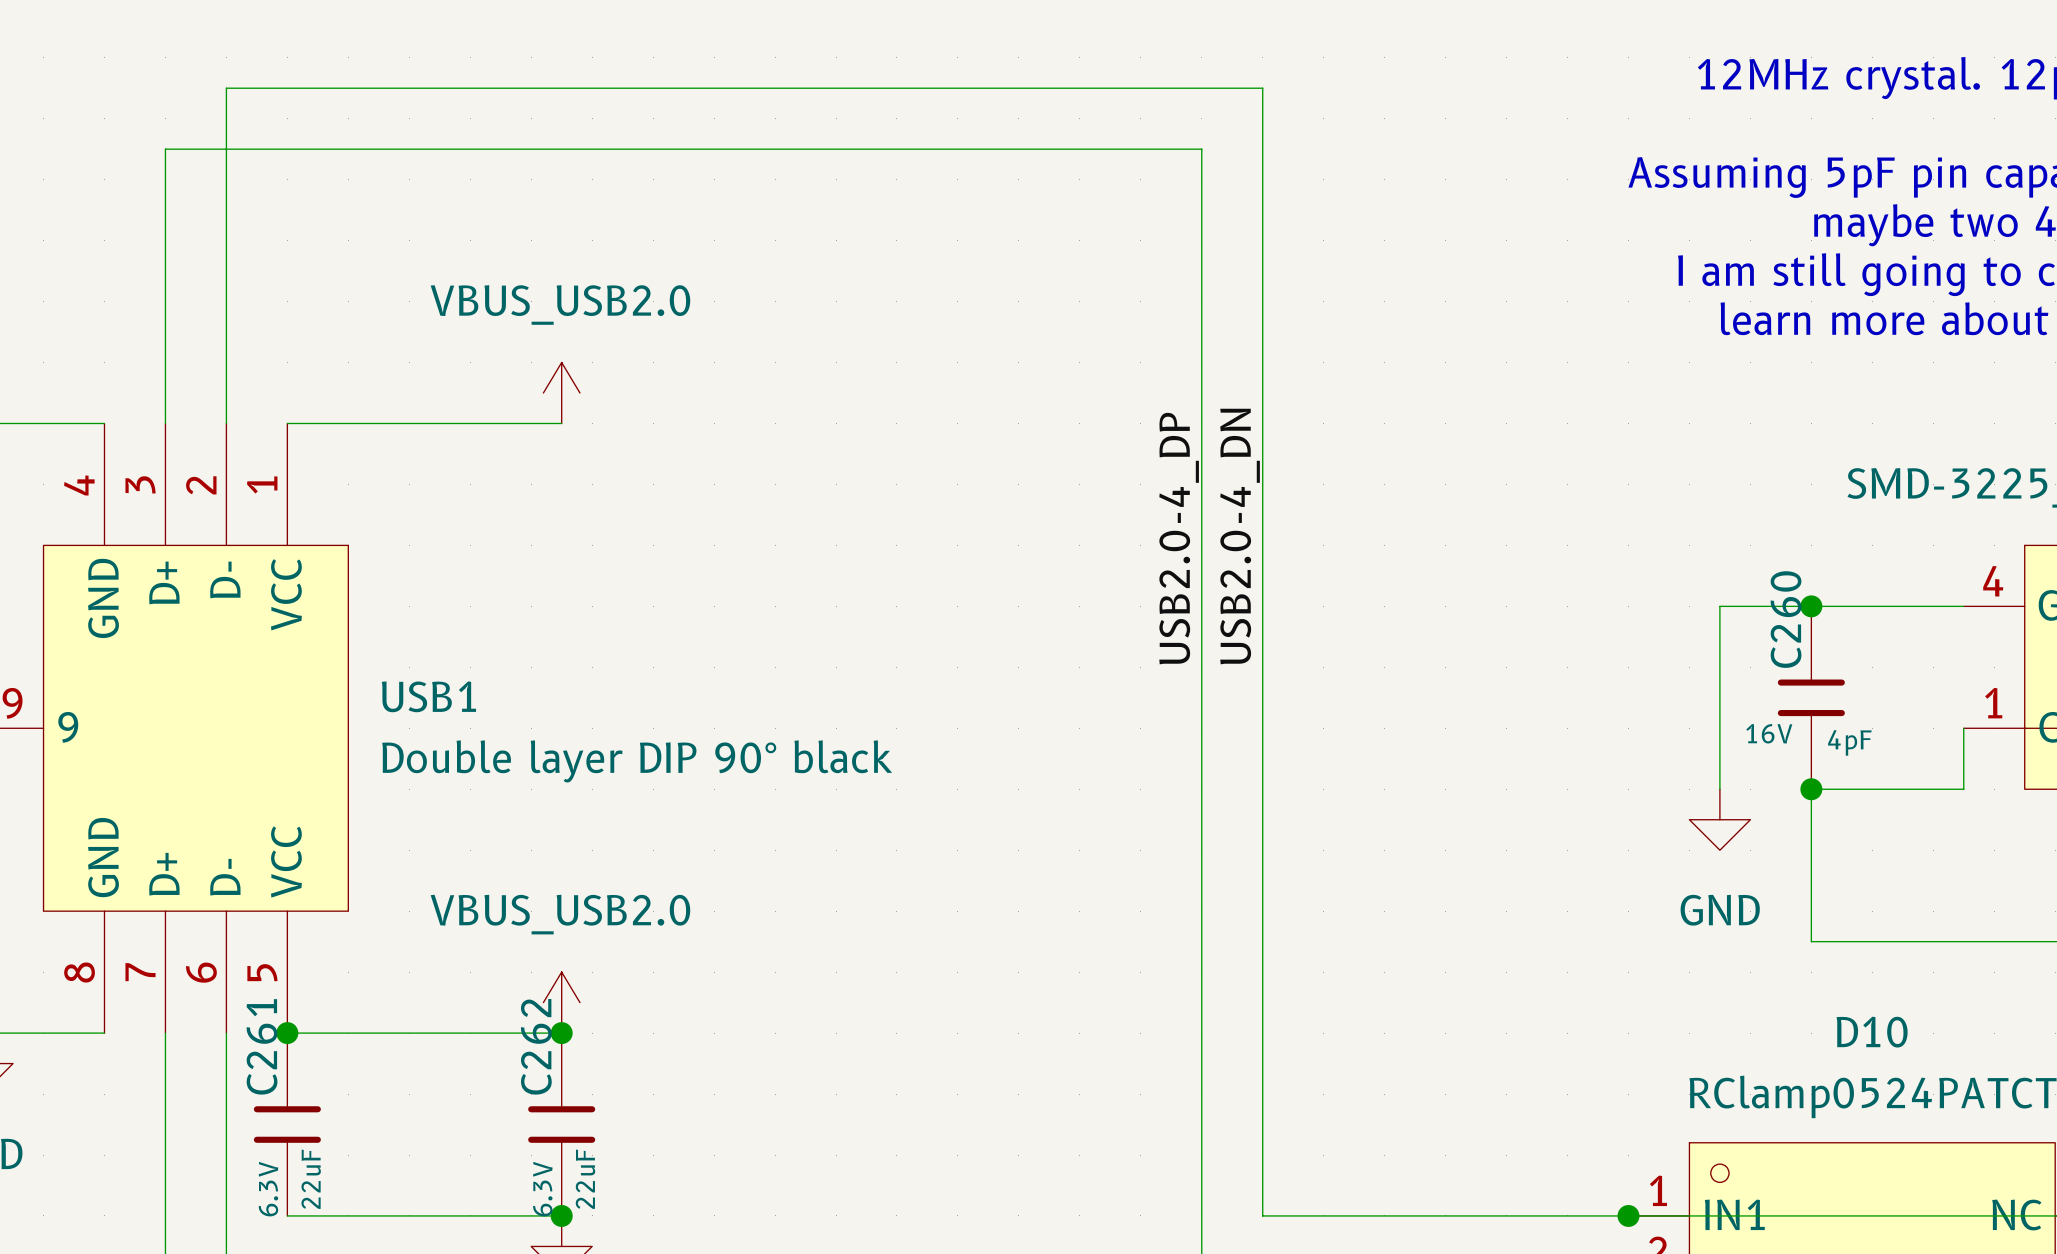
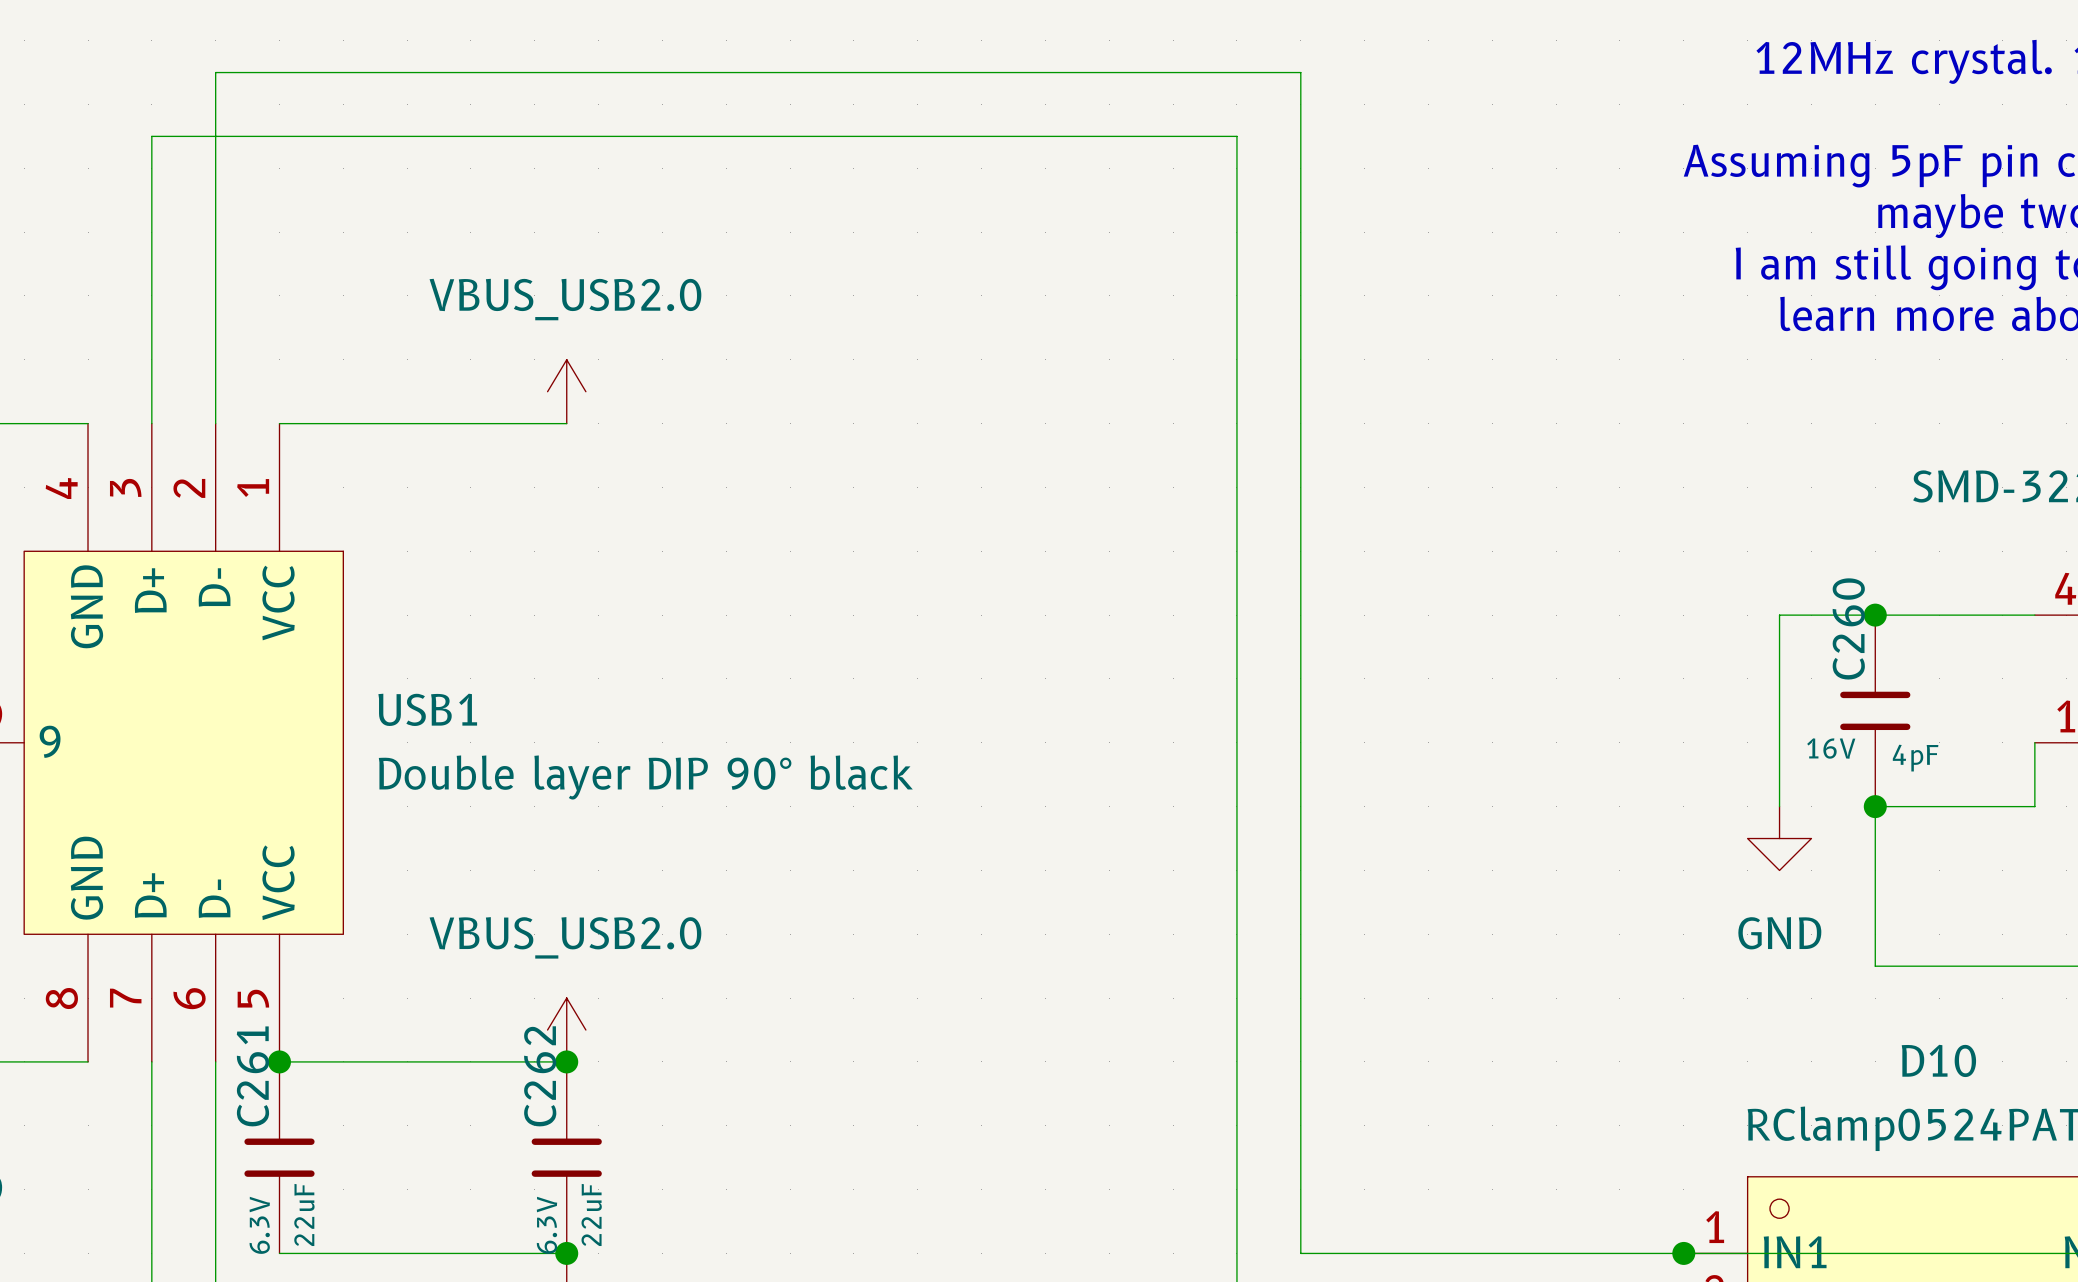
label: USB2.0-4_DN (1240, 536) -> none
label: USB2.0-4_DP (1179, 538) -> none

